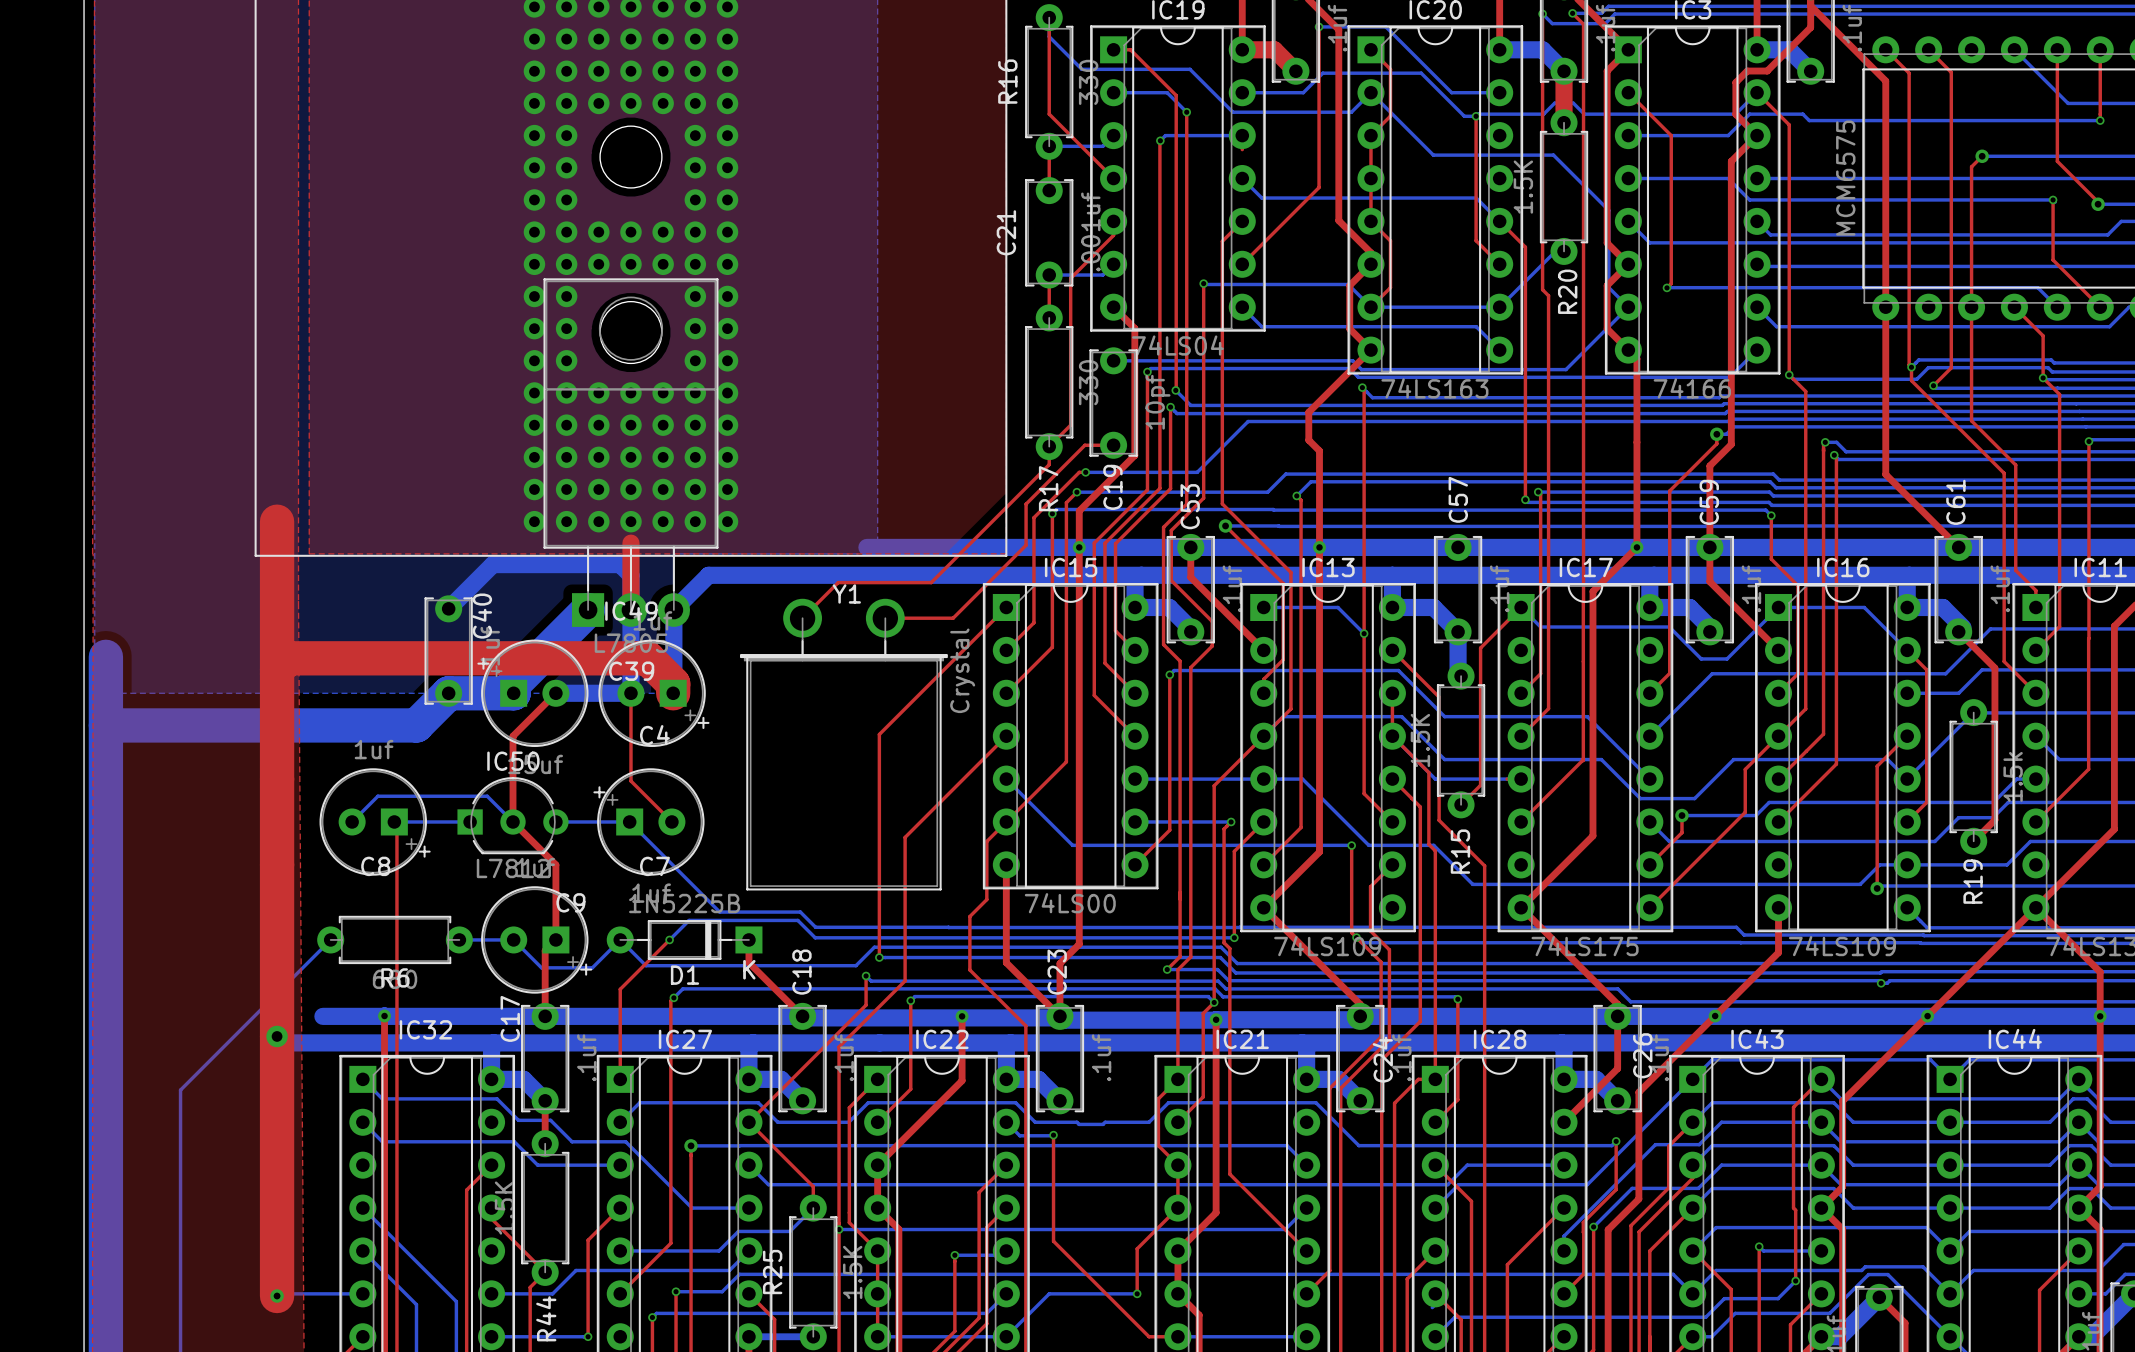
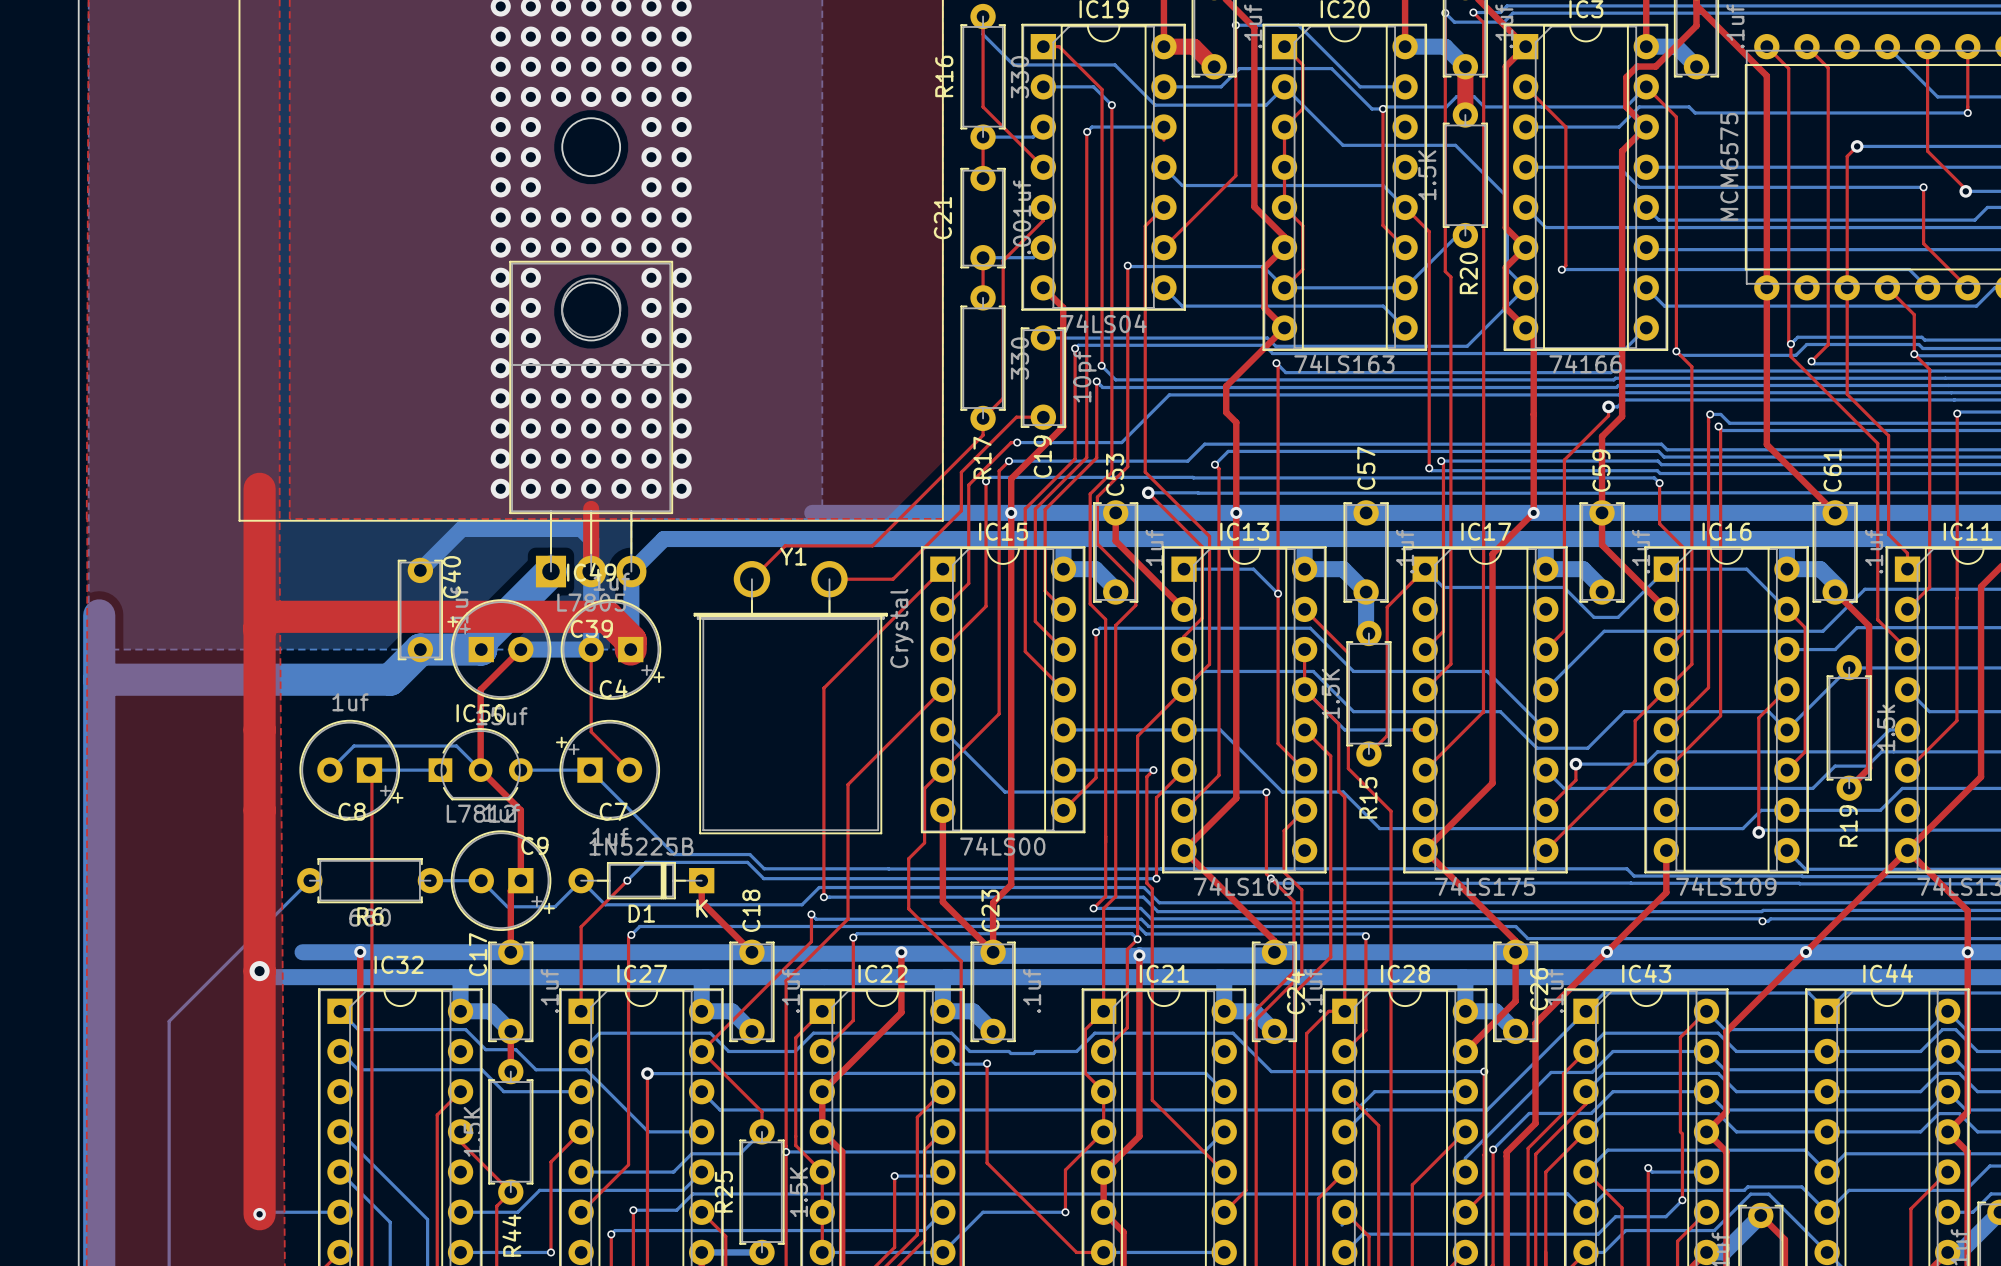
top track: (1616, 1141) (1616, 1189) (1583, 1222) (1583, 1232) -> (1484, 1071) (1483, 1154)
bottom track: (1616, 1141) (1611, 1145) (1358, 1145) (1356, 1143) -> (1484, 1071) (1271, 1071)
via position: (1616, 1141) -> (1484, 1071)

